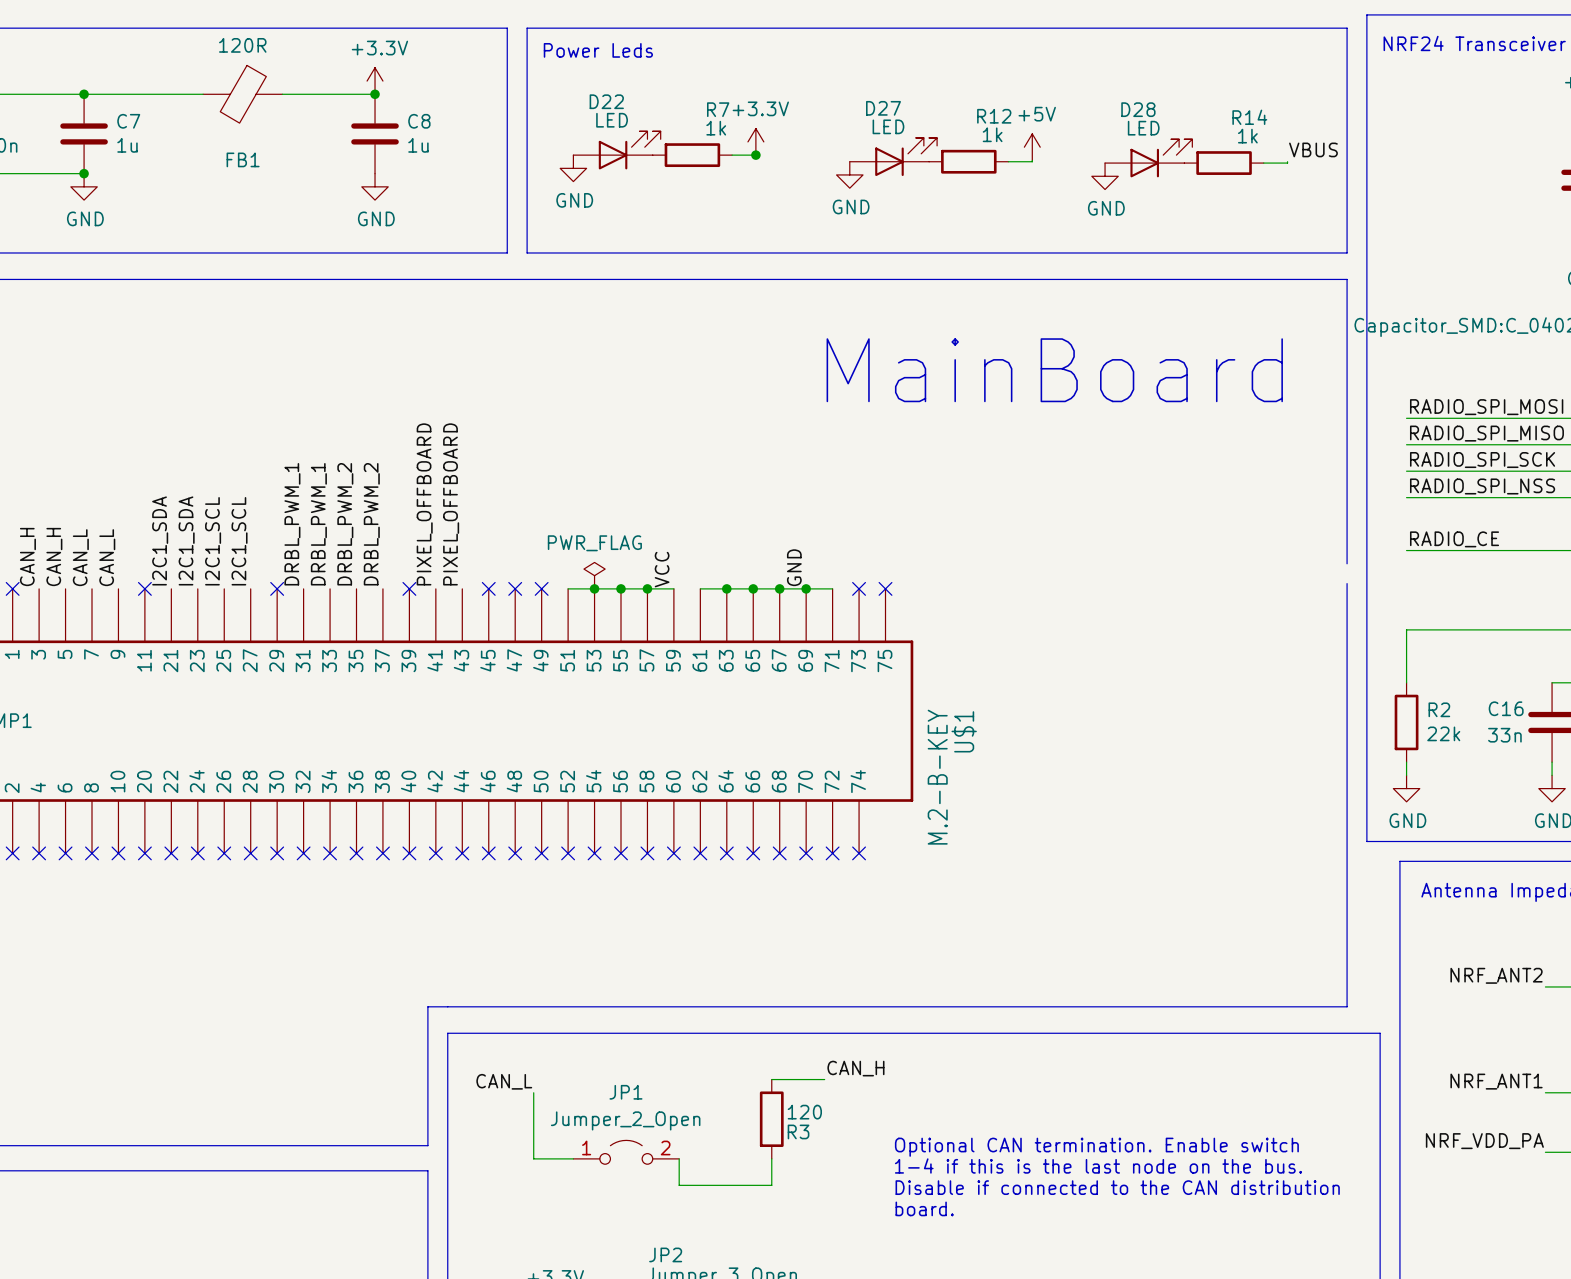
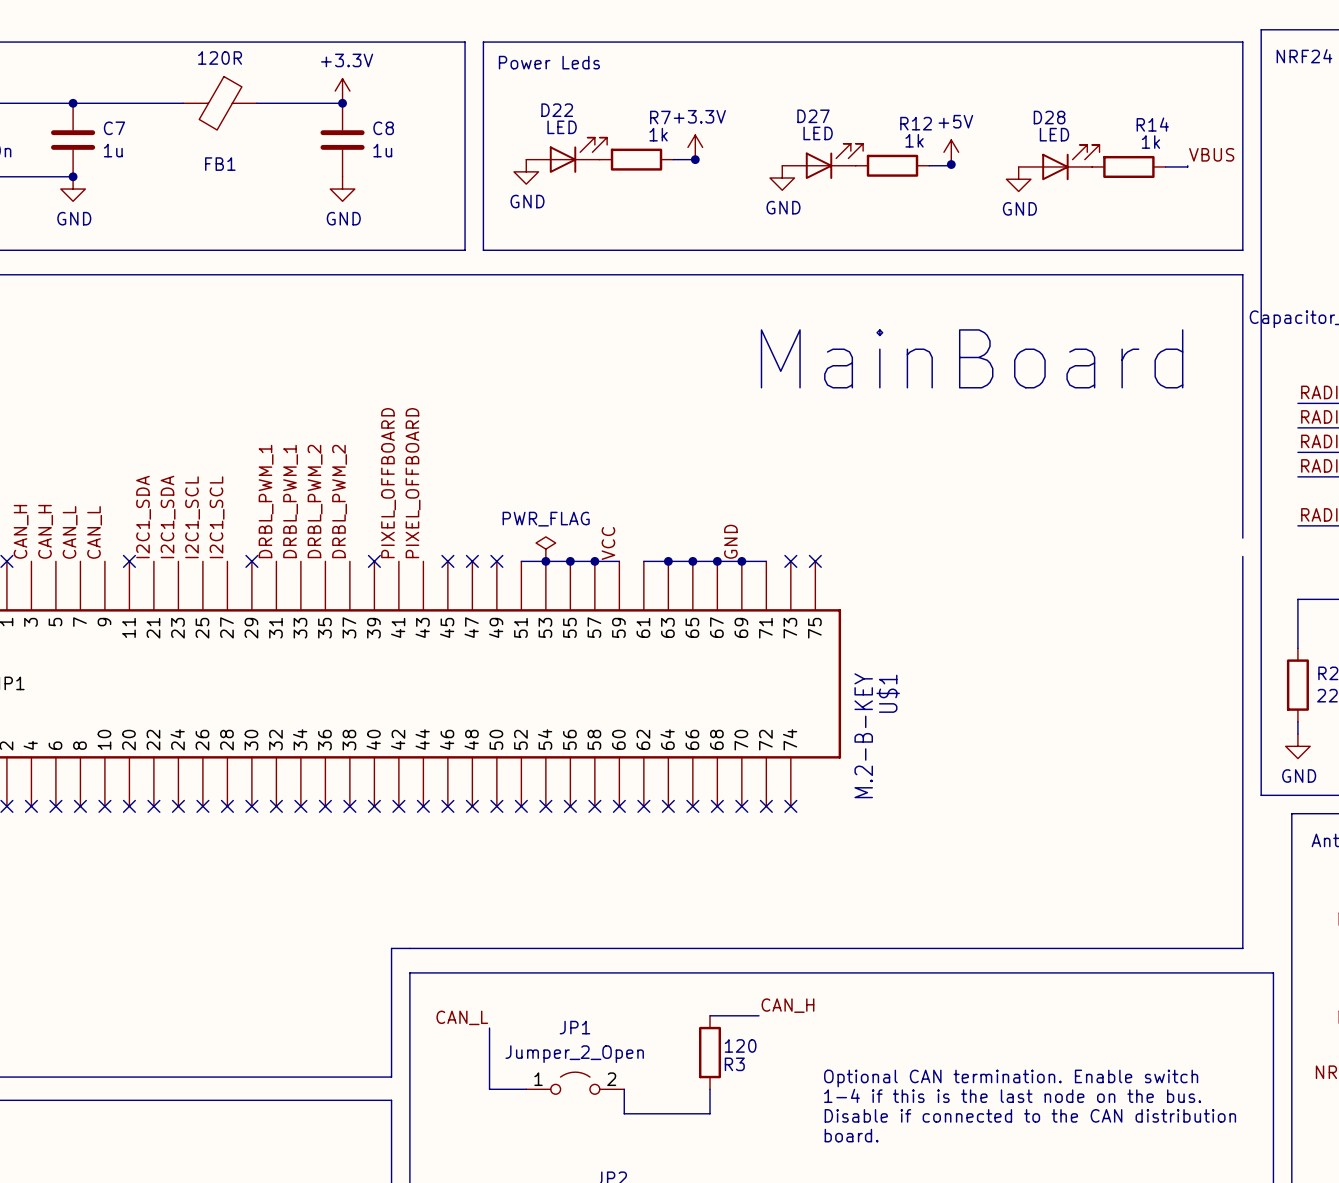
junction: none -> (951, 164)

